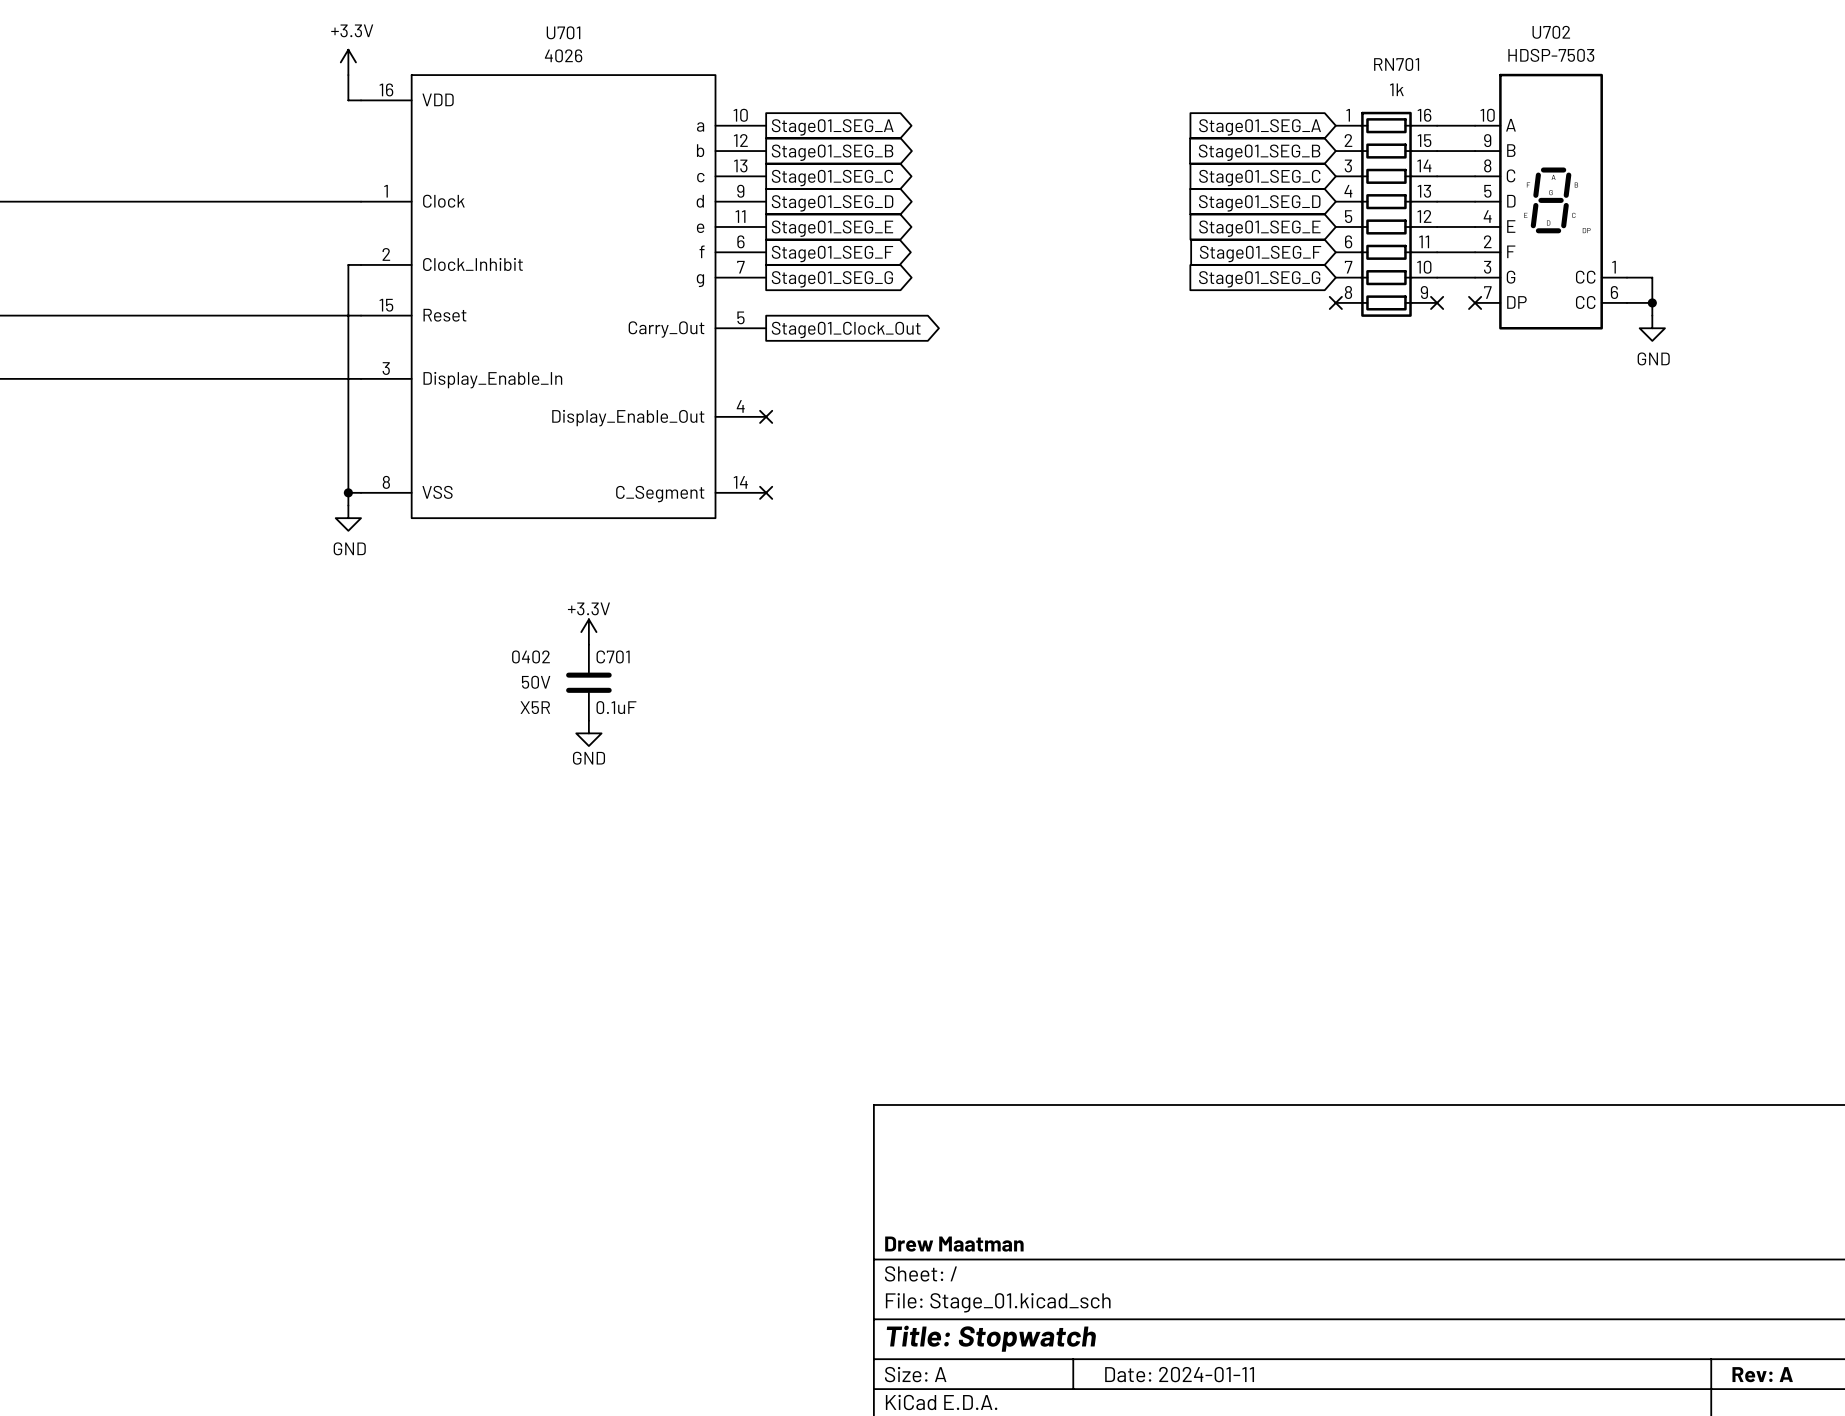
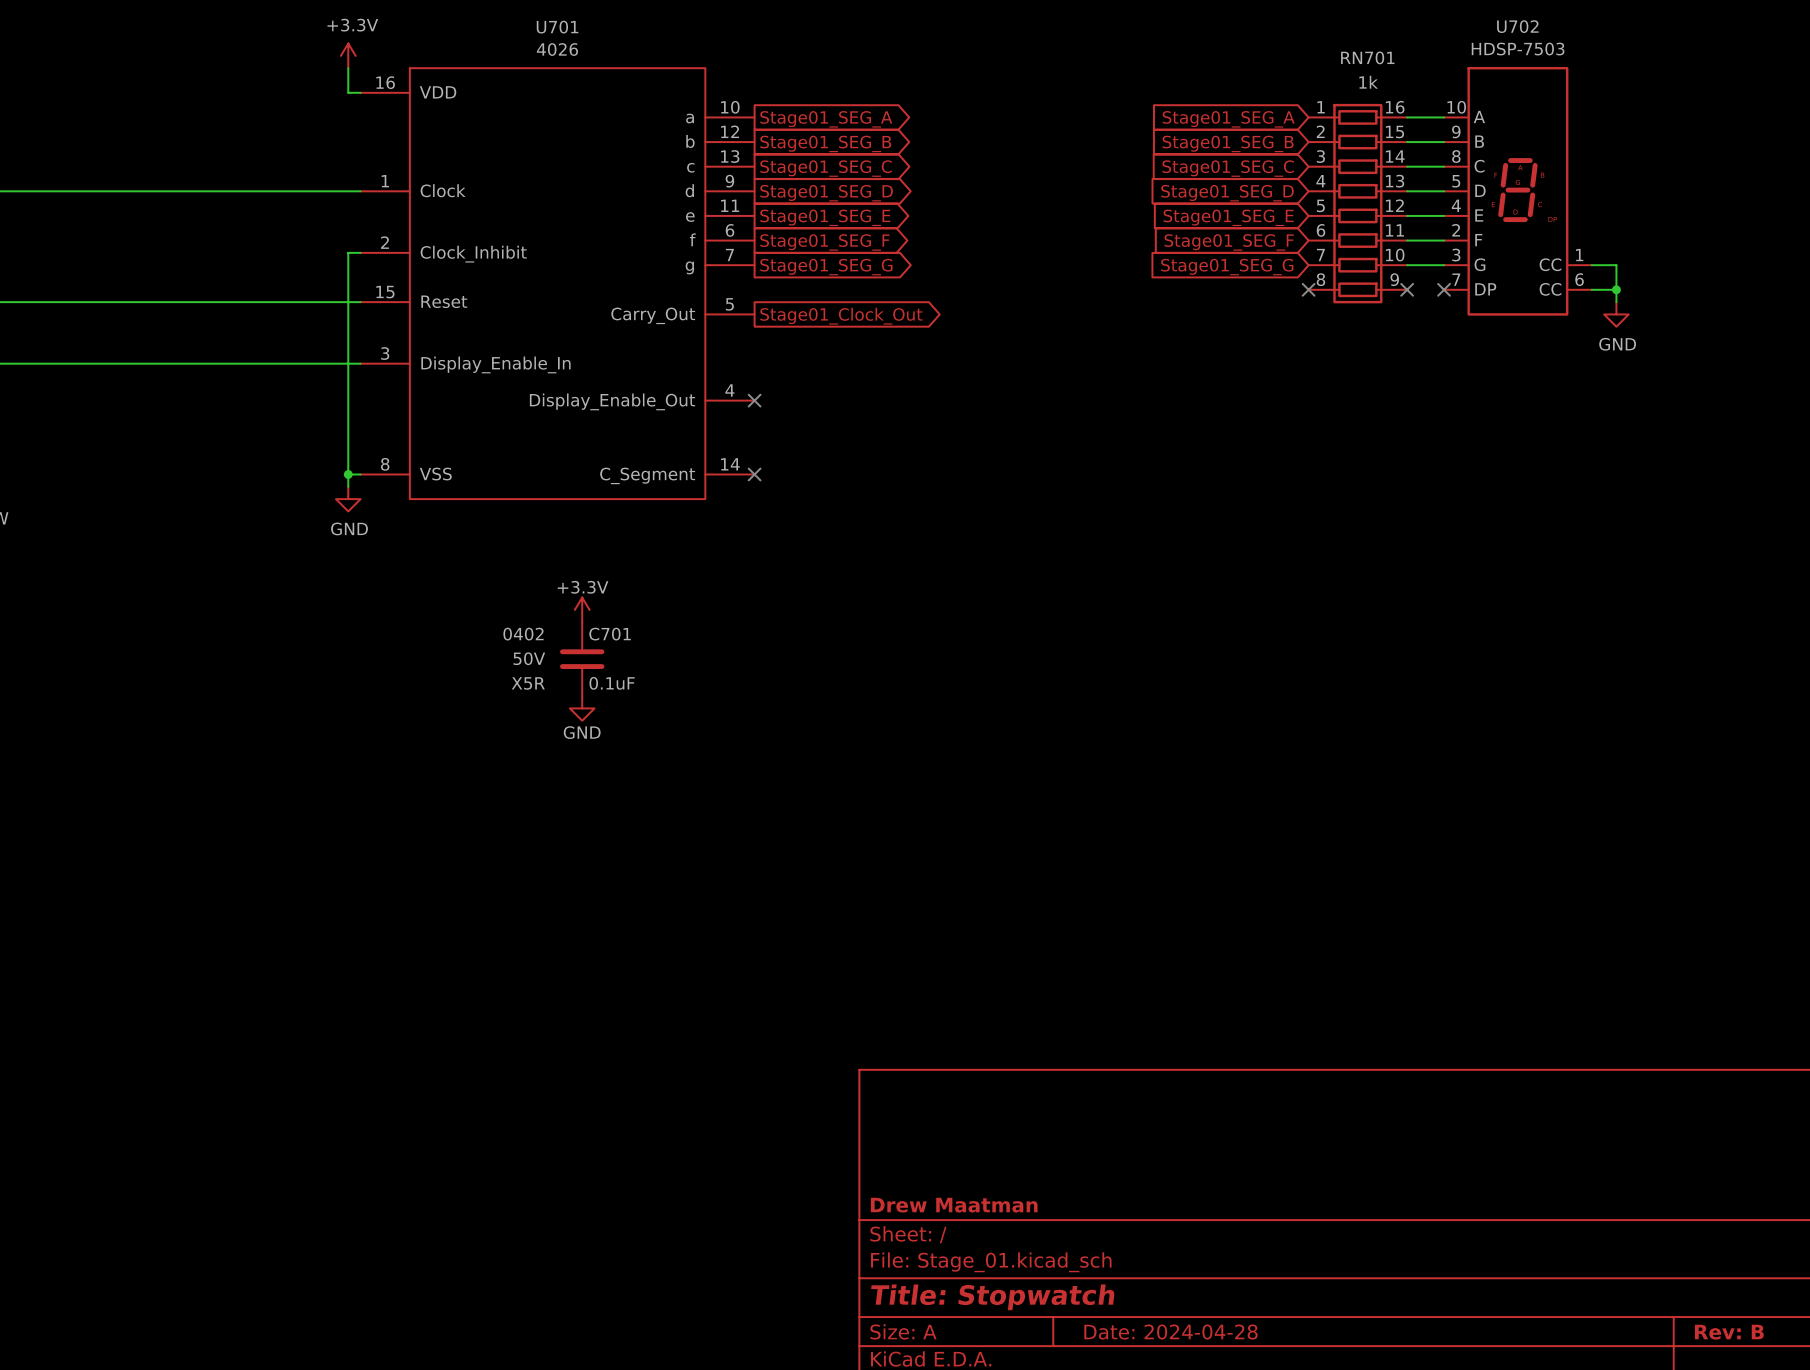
title block: Date: 2024-01-11 (1179, 1374) -> Date: 2024-04-28 (1170, 1332)
title block: Rev: A (1762, 1374) -> Rev: B (1729, 1332)

